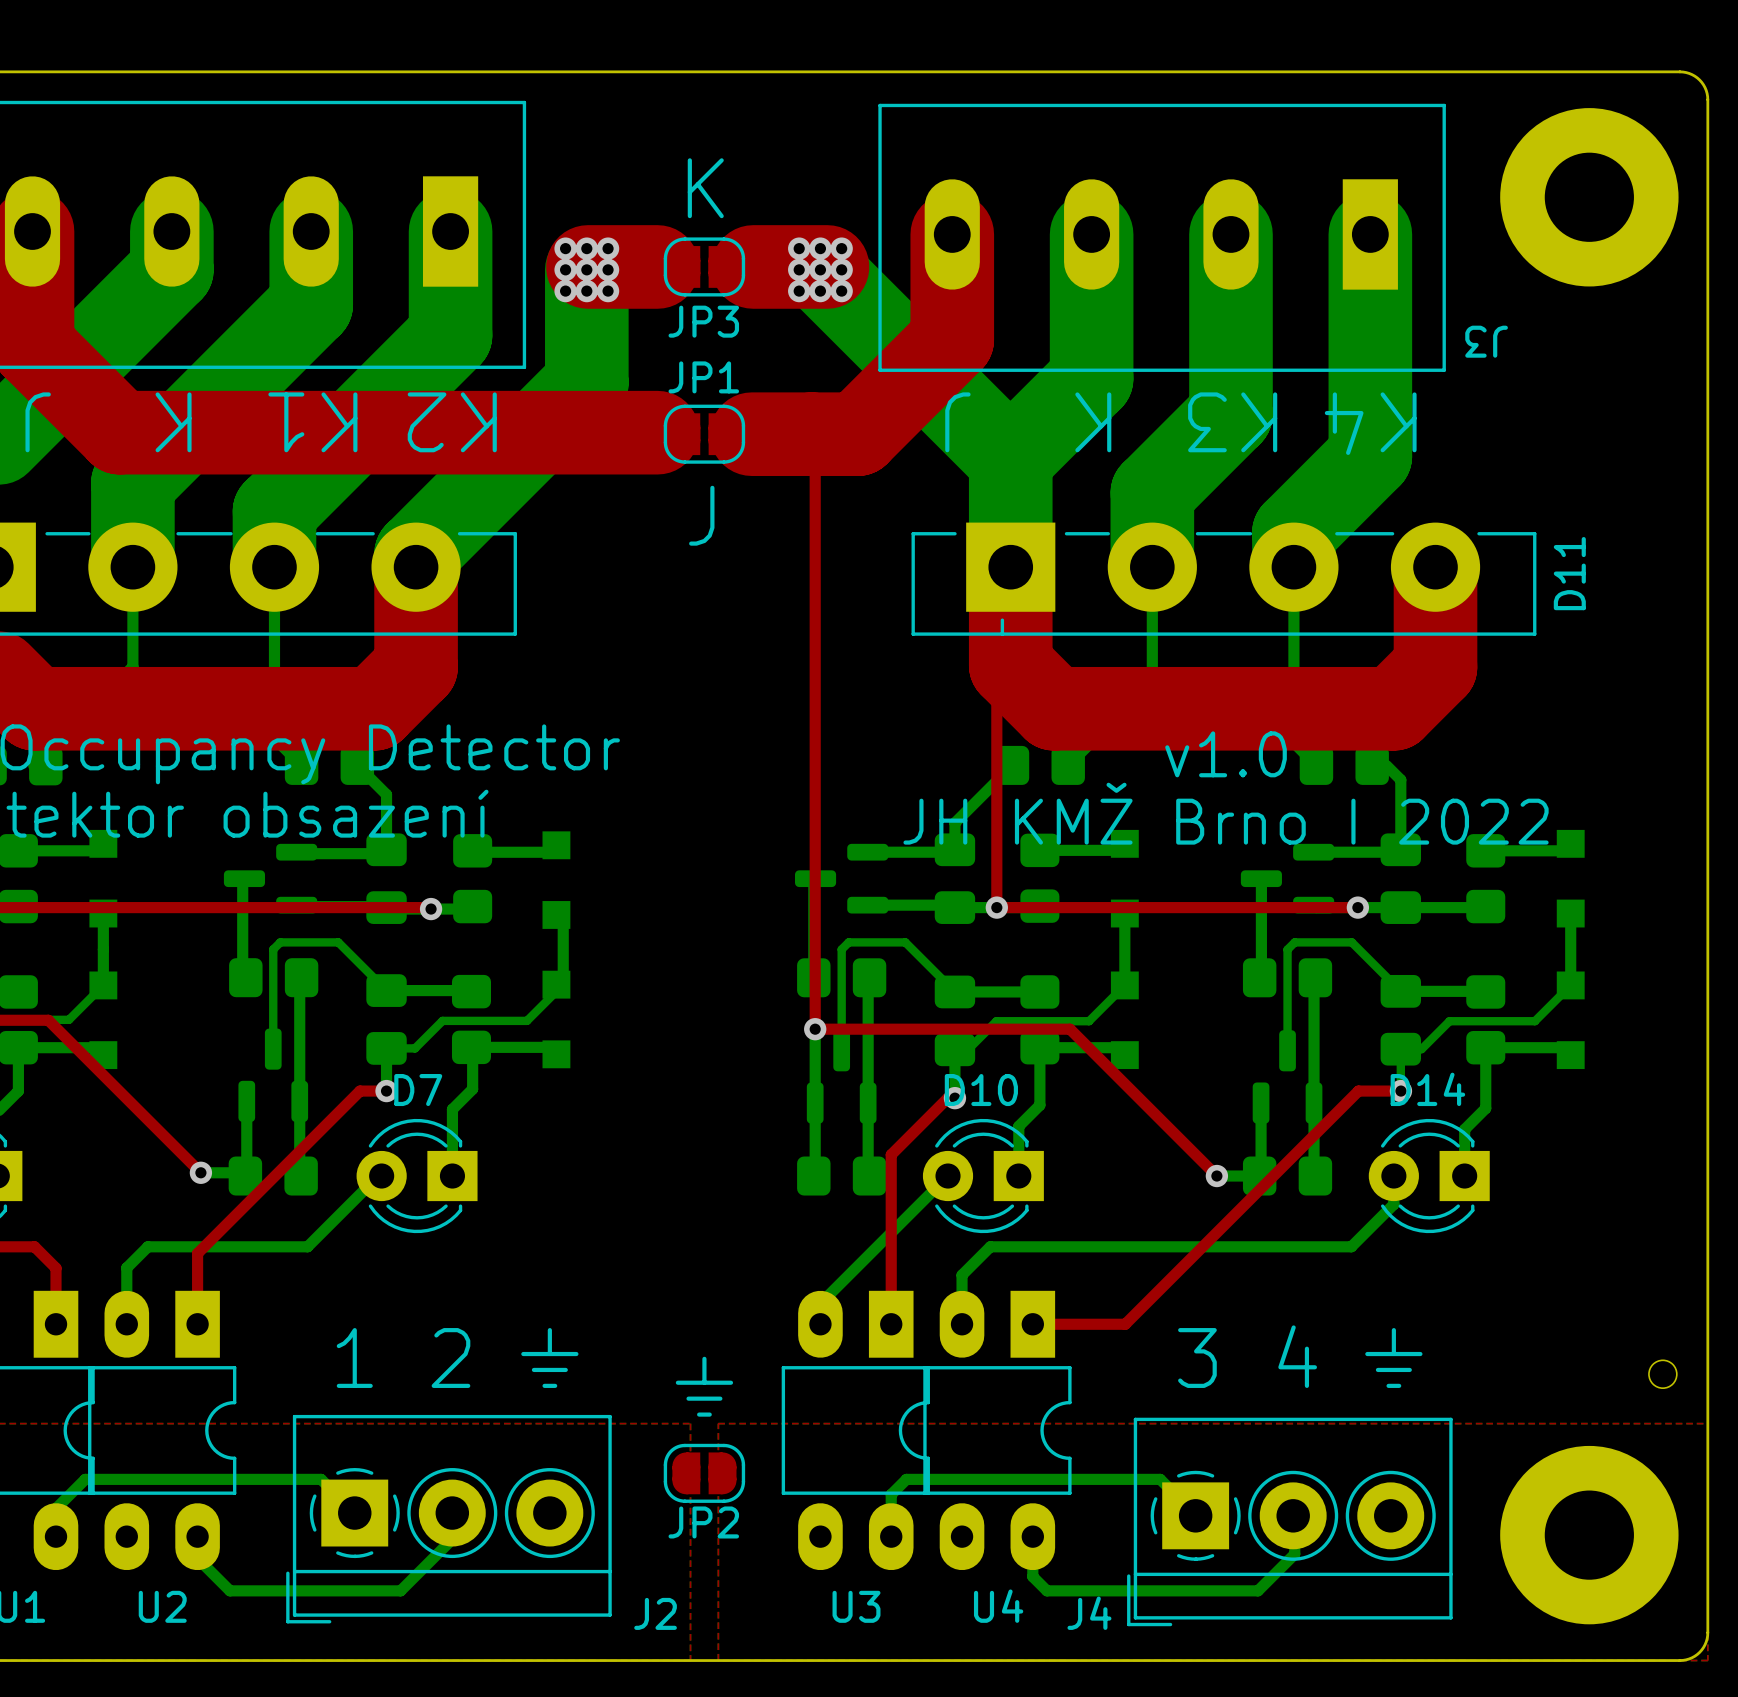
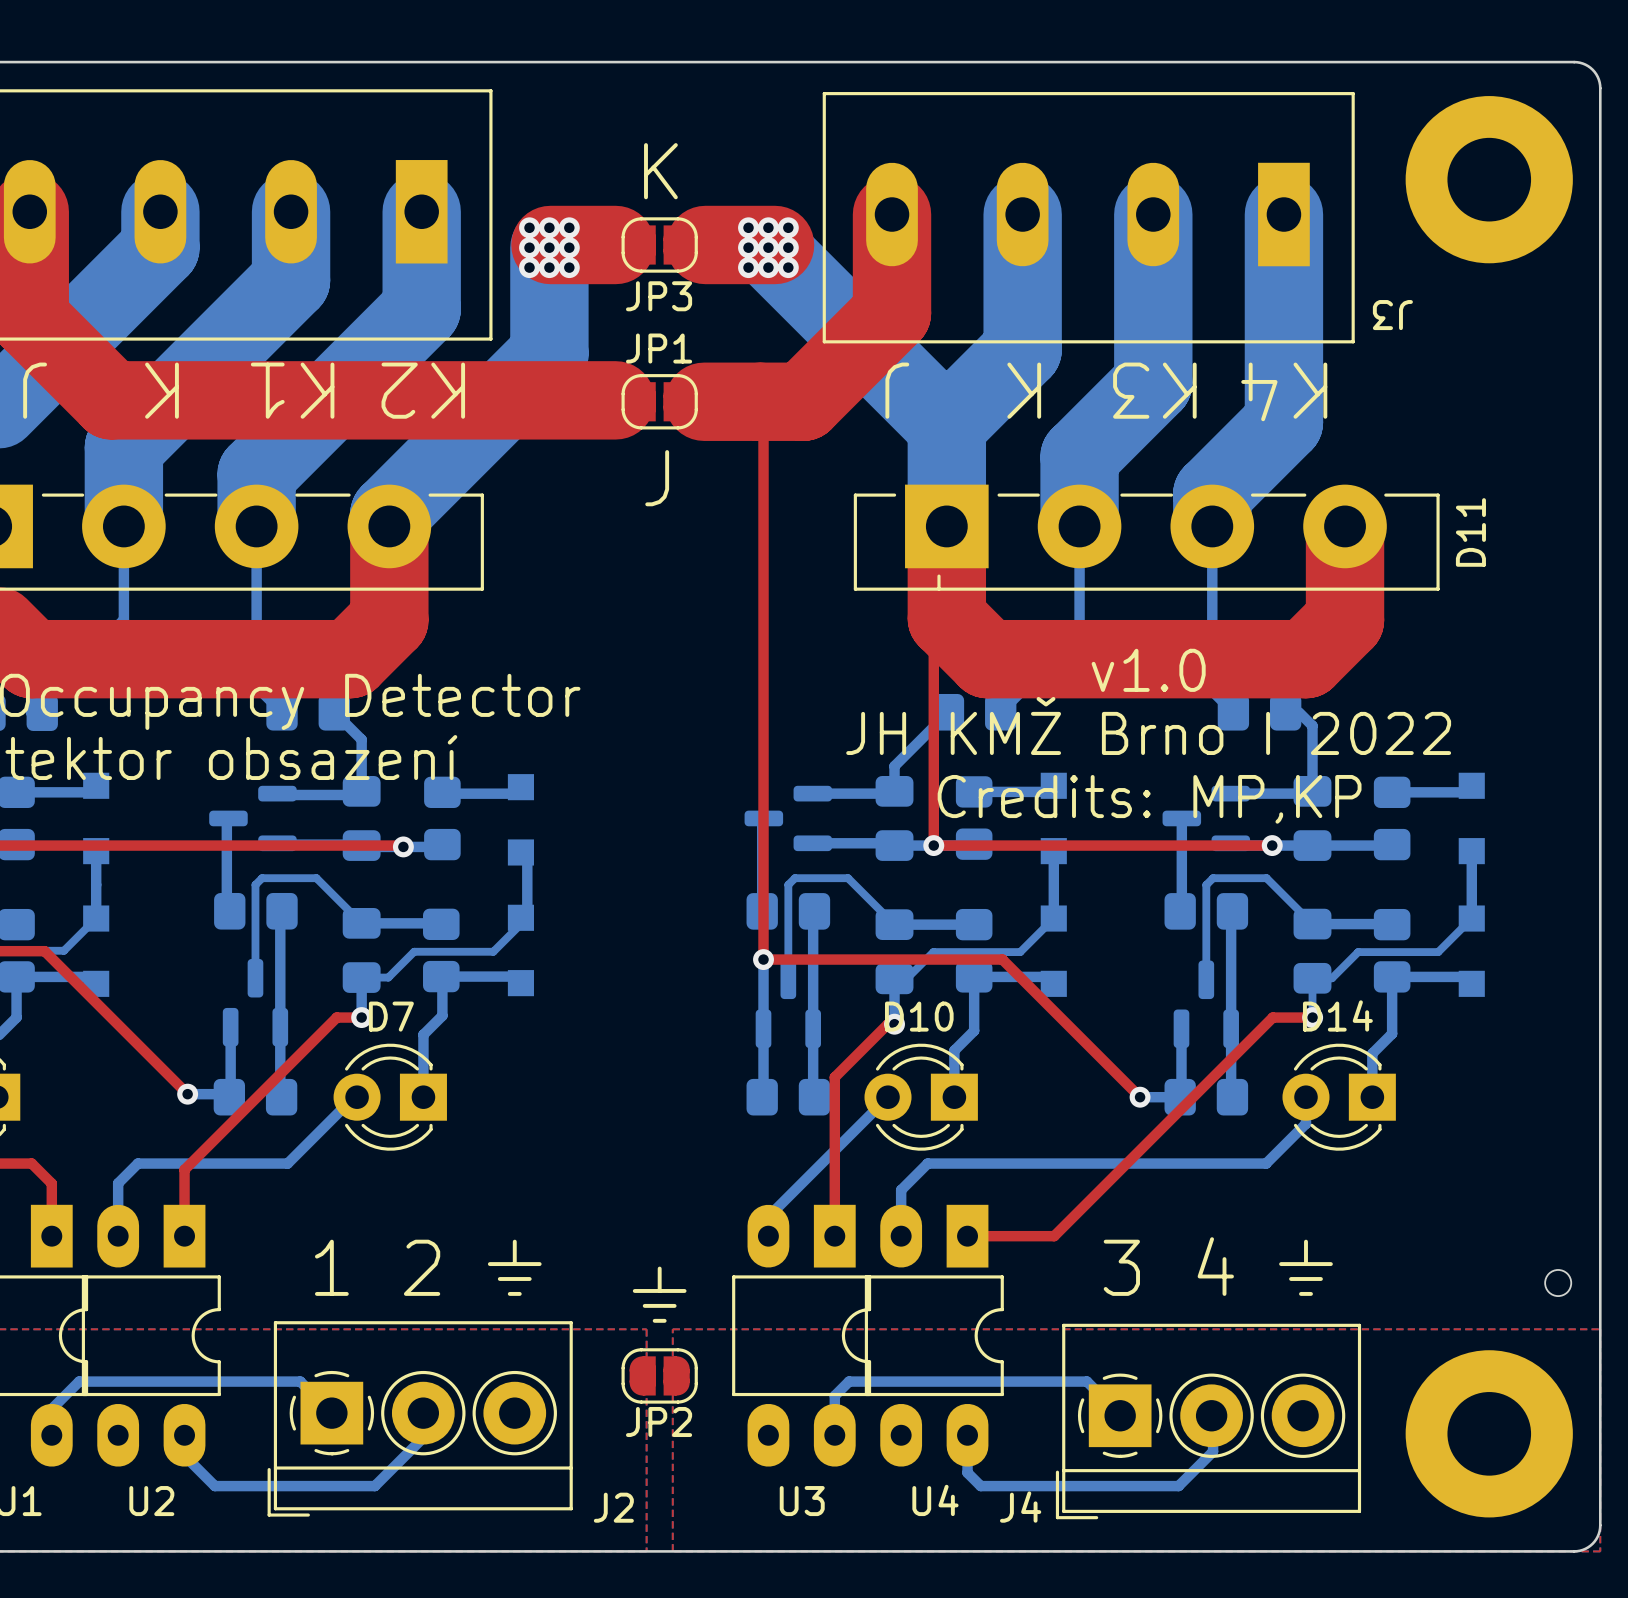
text position: v1.0 (1226, 754) -> v1.0 (1148, 670)
text position: JH KMŽ Brno I 2022 (1226, 813) -> JH KMŽ Brno I 2022 (1148, 725)
text: none -> Credits: MP,KP (1149, 799)

